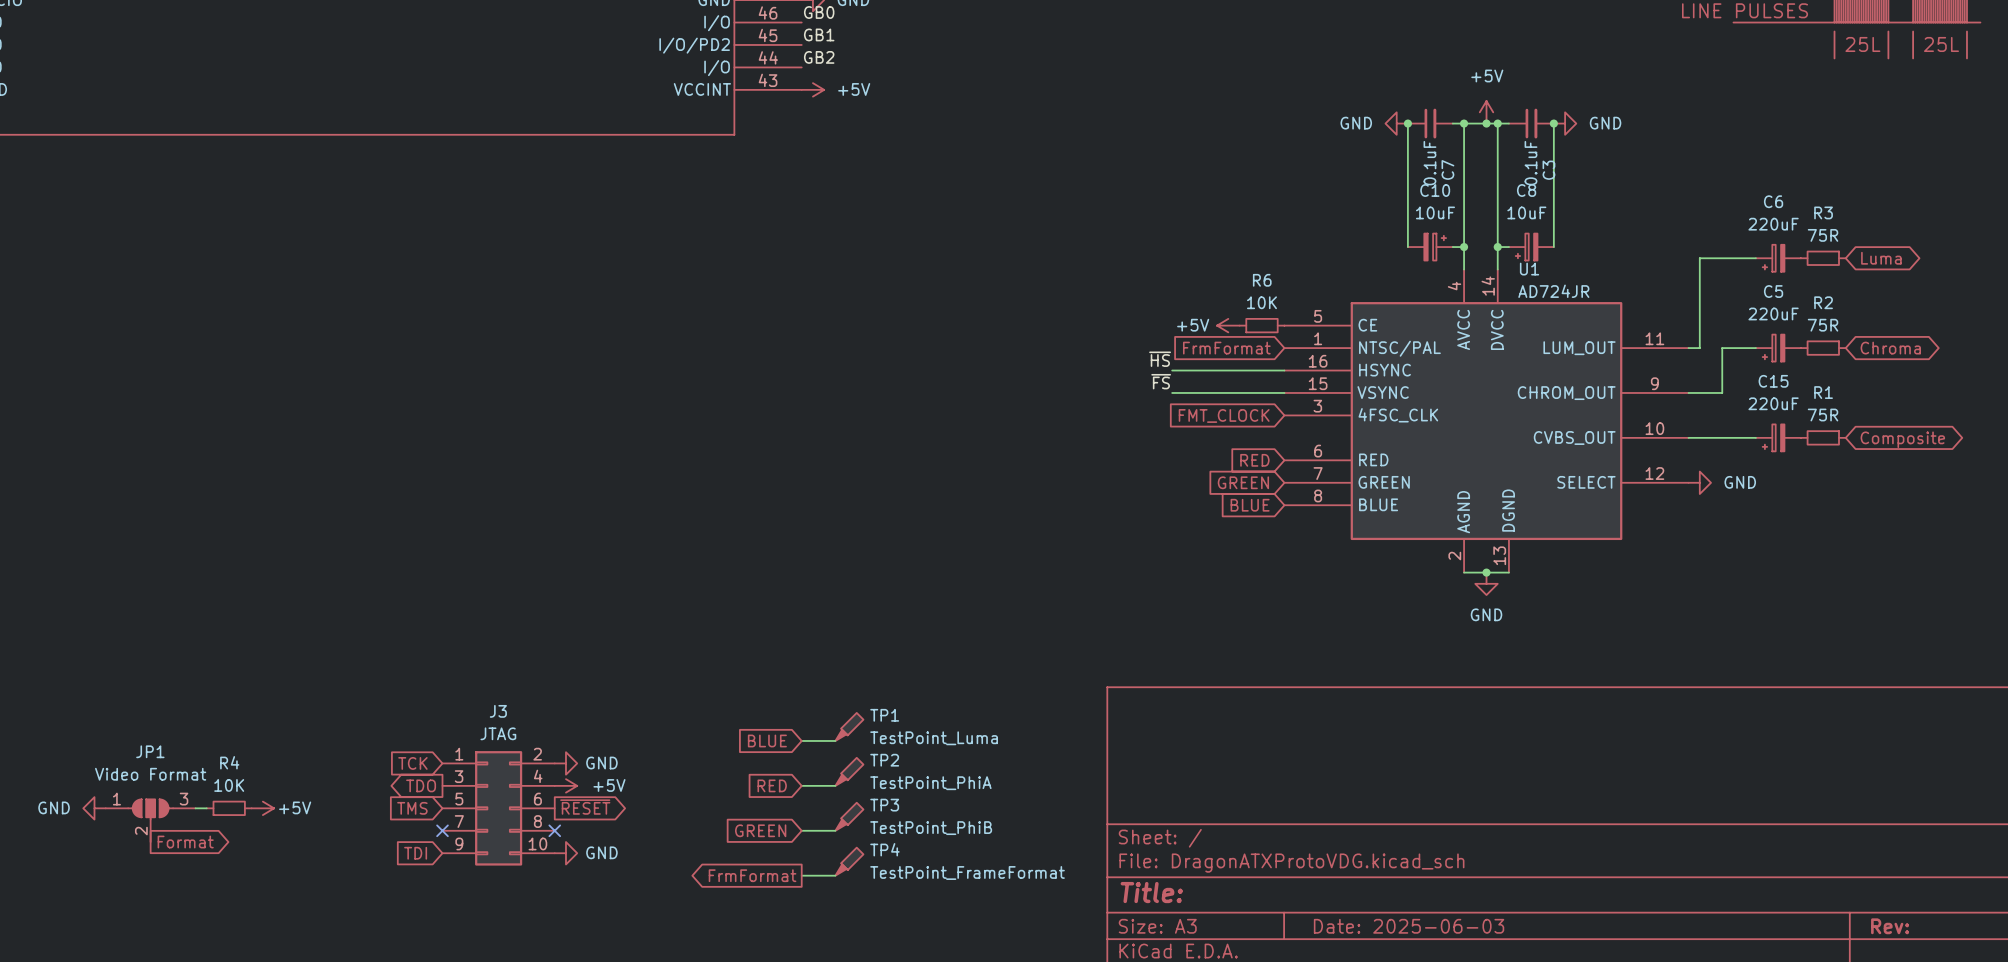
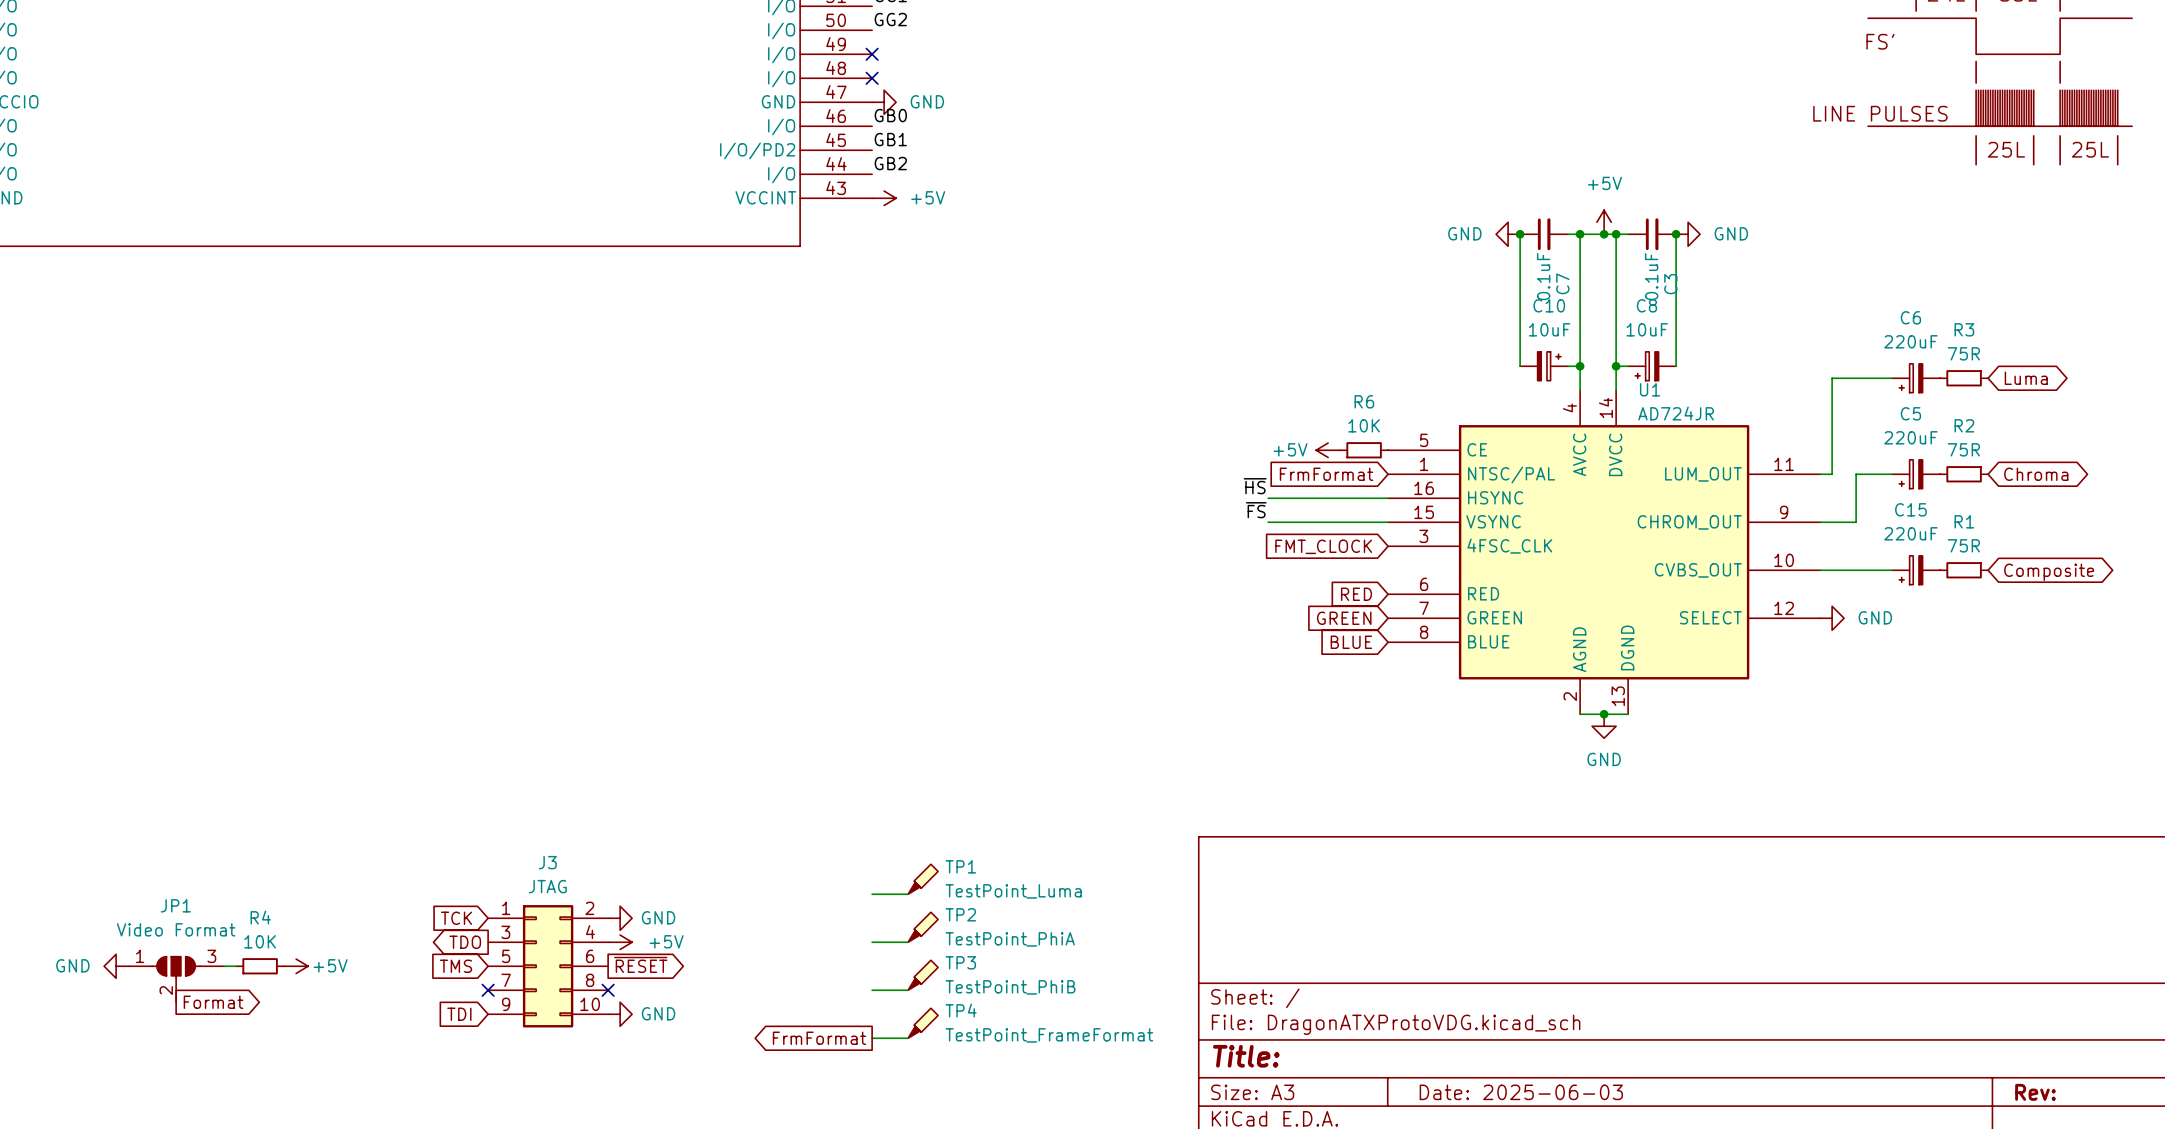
global label: BLUE (767, 740) -> none
global label: RED (772, 785) -> none
global label: GREEN (760, 830) -> none

